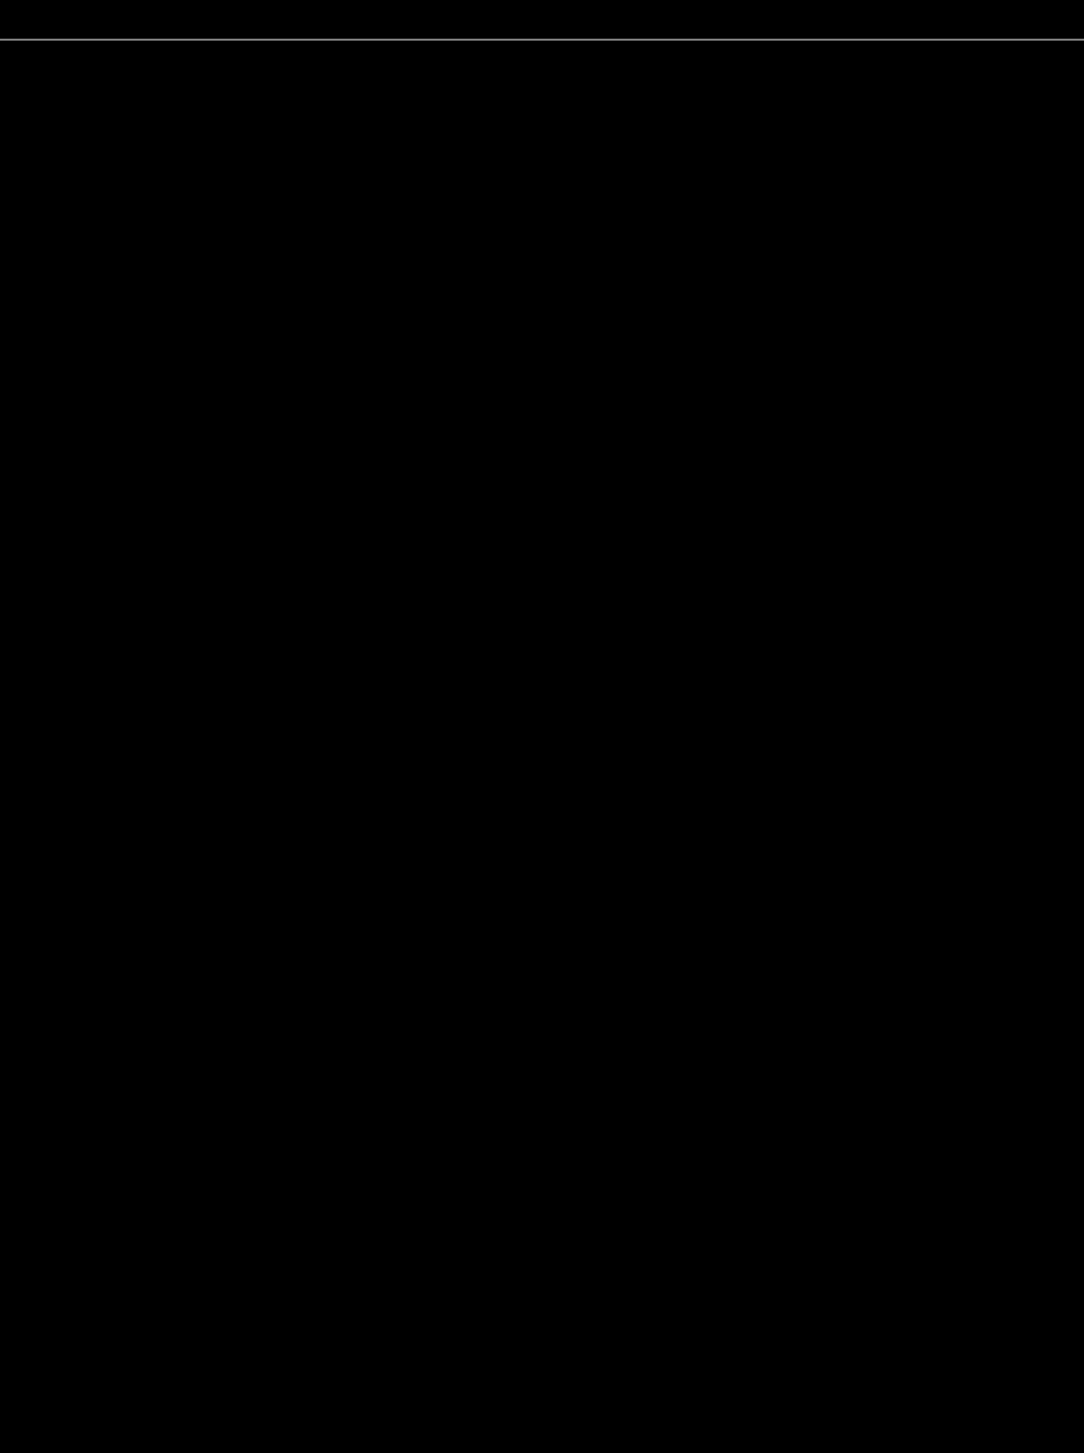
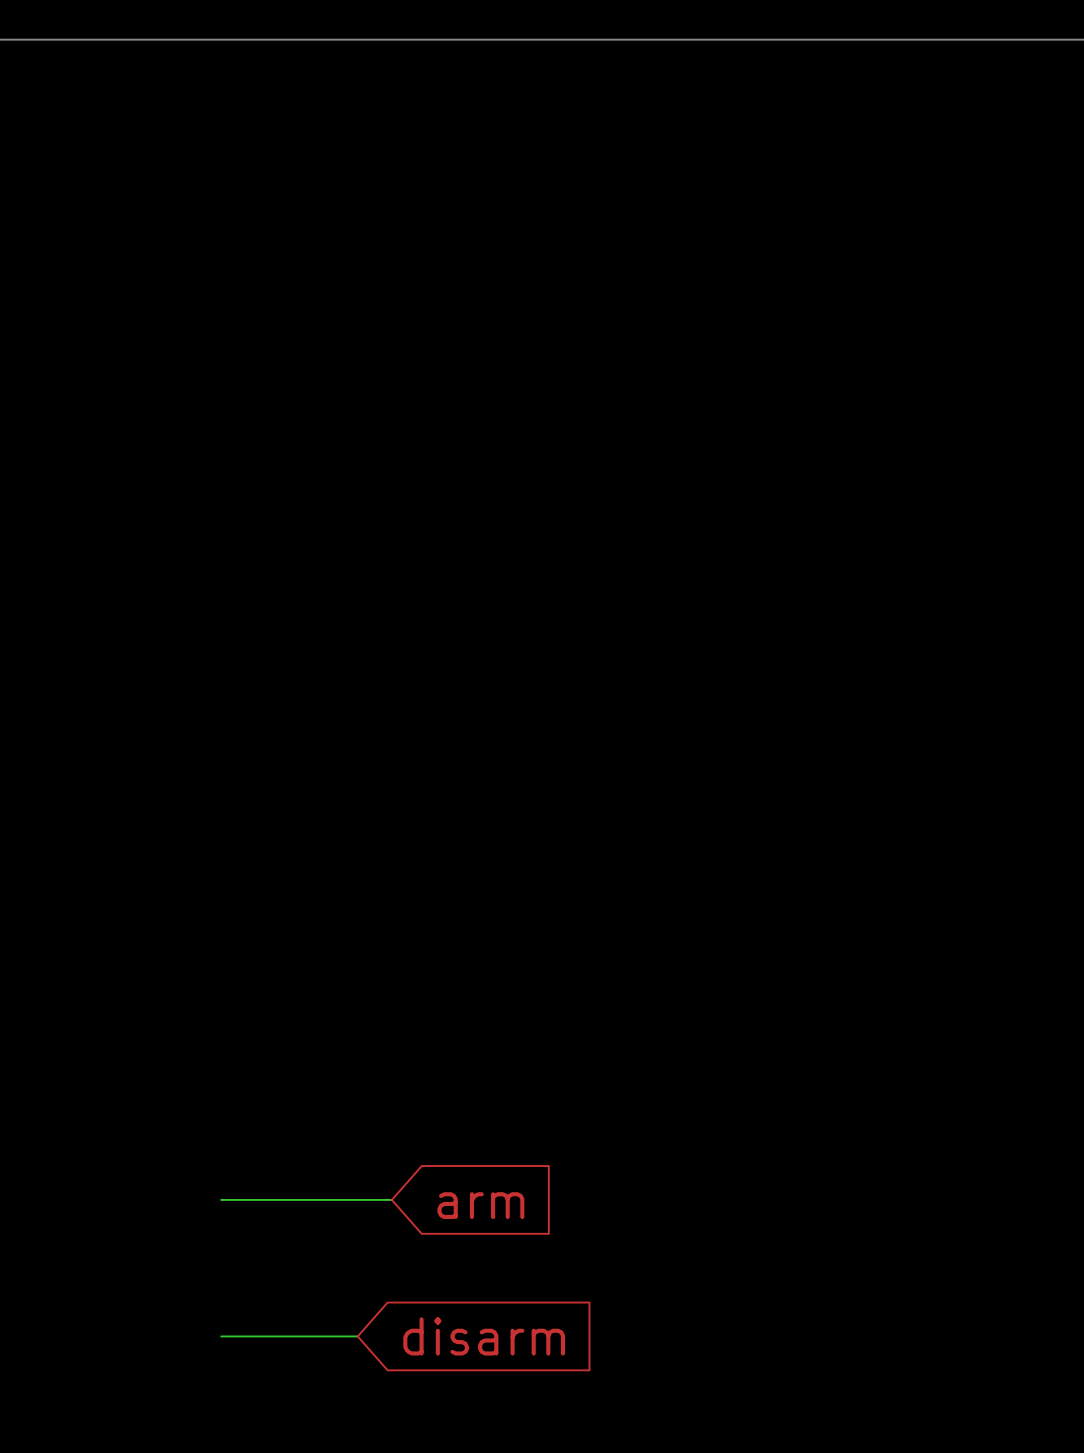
wire: none -> (221, 1199) (391, 1199)
global label: none -> arm (480, 1205)
wire: none -> (221, 1336) (357, 1336)
global label: none -> disarm (484, 1336)

